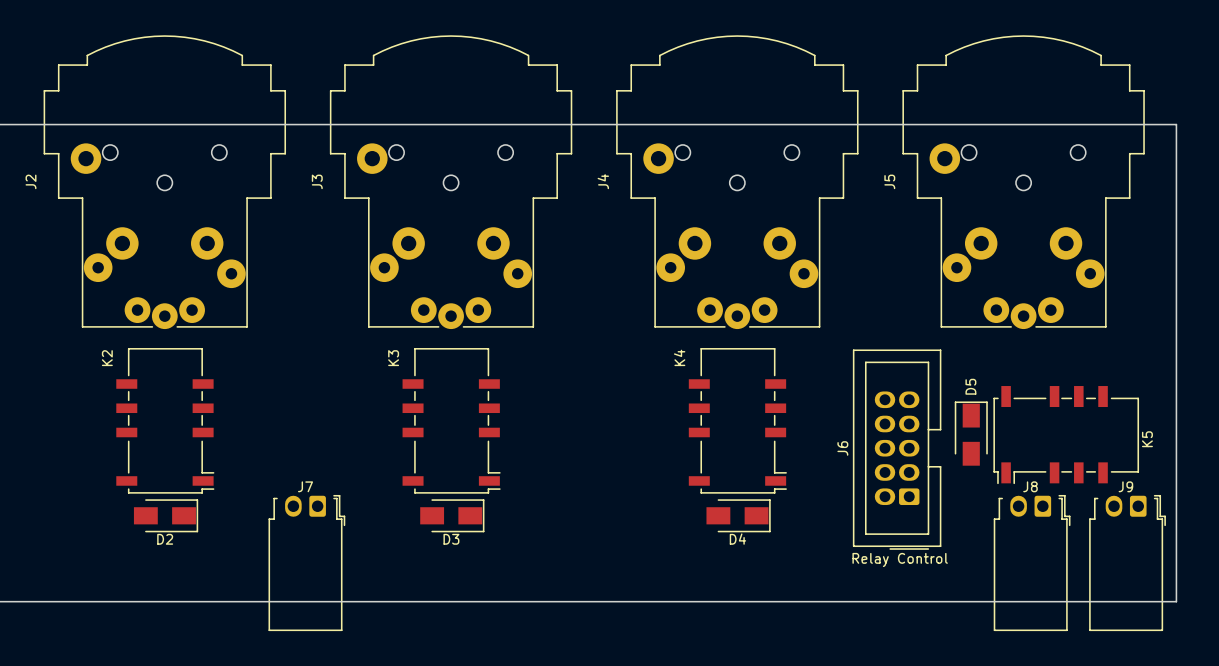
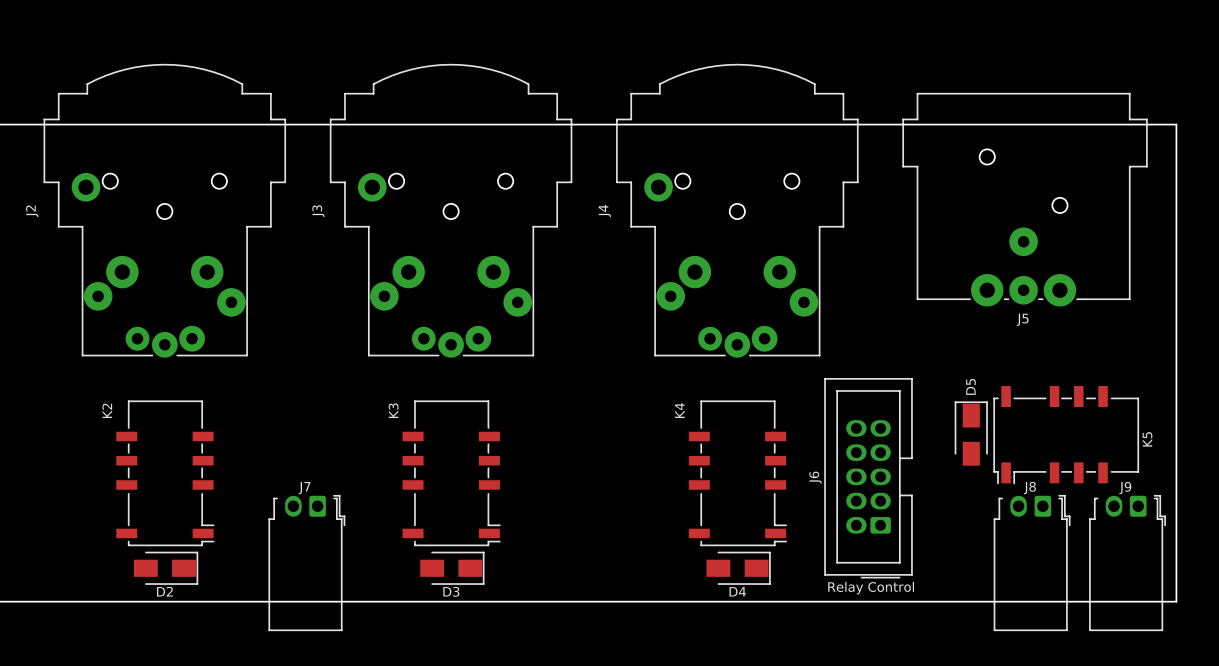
J2 footprint: [43, 35, 286, 330] -> [43, 64, 286, 358]
J3 footprint: [330, 35, 573, 330] -> [330, 64, 573, 358]
J4 footprint: [616, 35, 859, 330] -> [616, 64, 859, 358]
J5 footprint: [902, 35, 1145, 330] -> [902, 93, 1148, 307]
J5 name position: J5 (889, 181) -> J5 (1022, 319)
K2 position: (165, 420) -> (165, 473)
K3 position: (451, 420) -> (451, 473)
K4 position: (737, 420) -> (737, 473)
J6 position: (897, 449) -> (868, 478)
D2 position: (165, 515) -> (165, 568)
D3 position: (452, 515) -> (452, 568)
D4 position: (738, 515) -> (738, 568)

